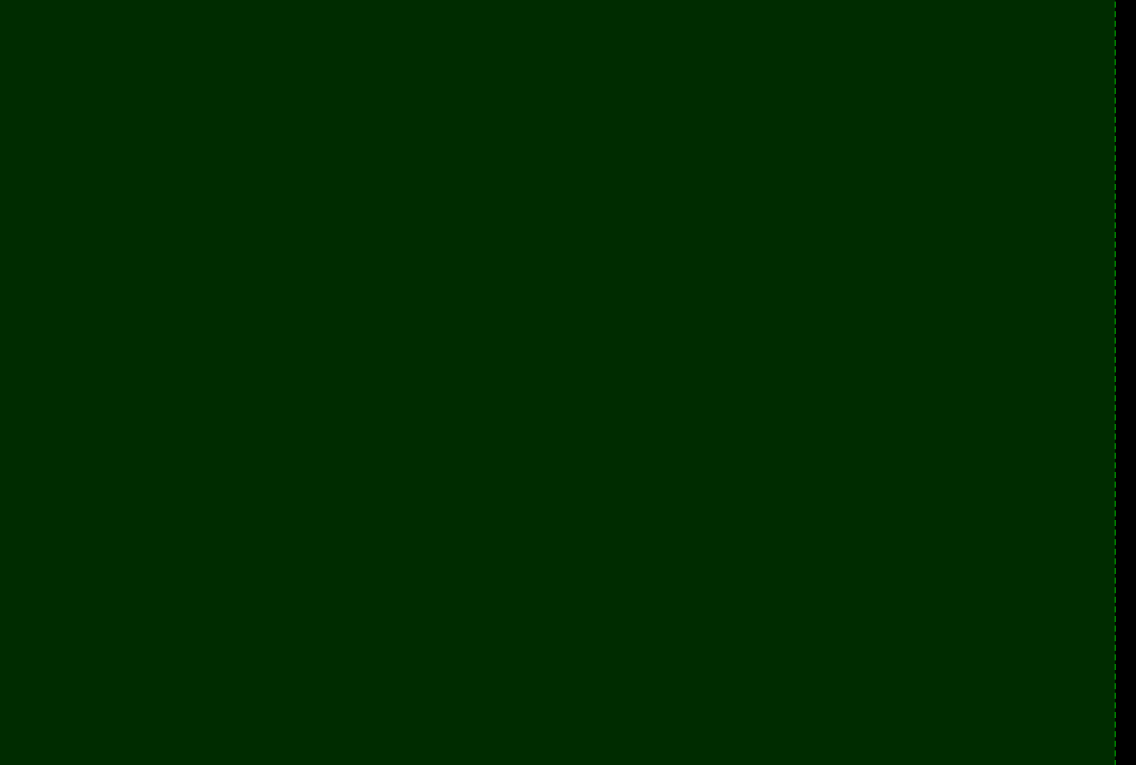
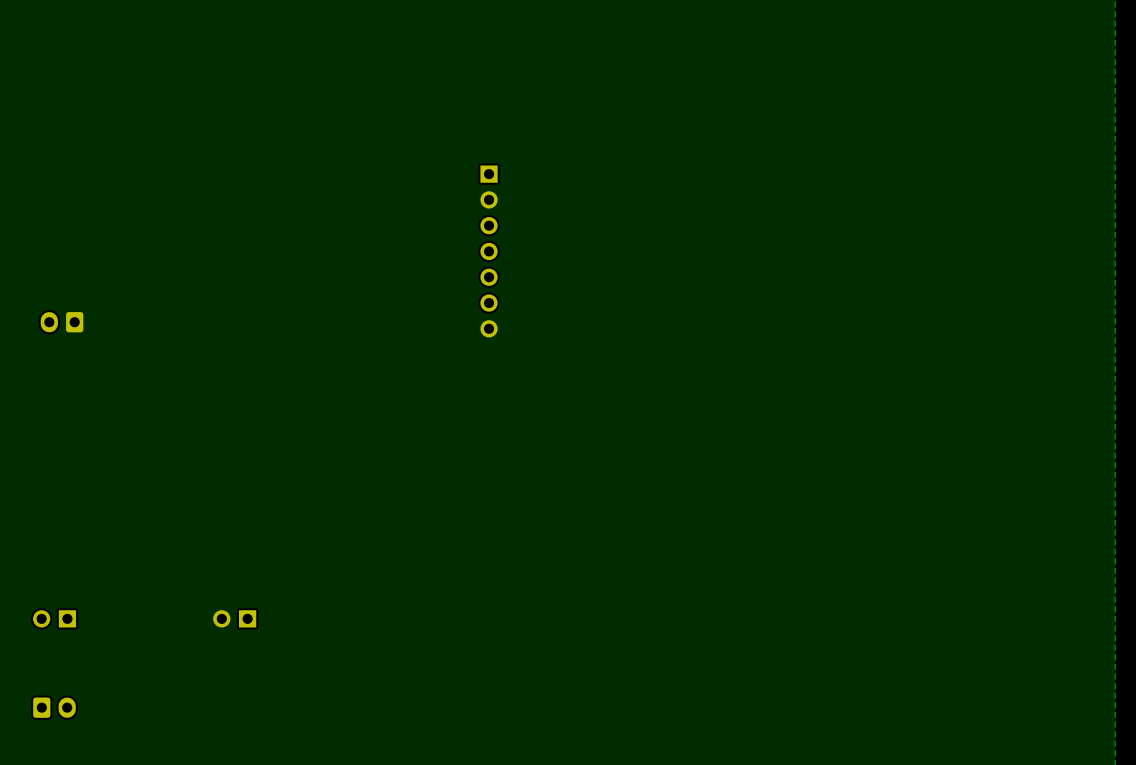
part: none -> (489, 251)
part: none -> (62, 322)
part: none -> (54, 618)
part: none -> (234, 618)
part: none -> (54, 707)

